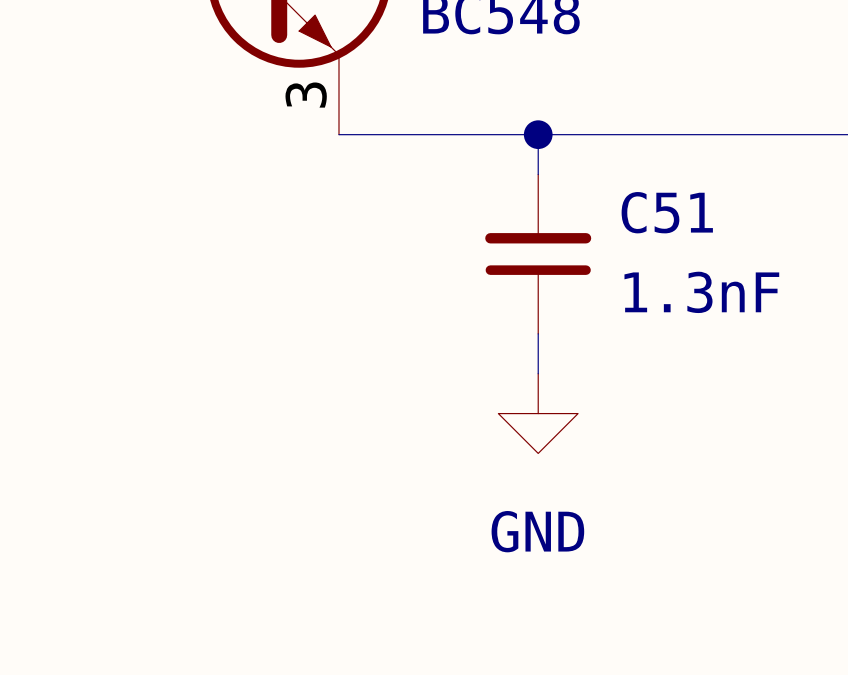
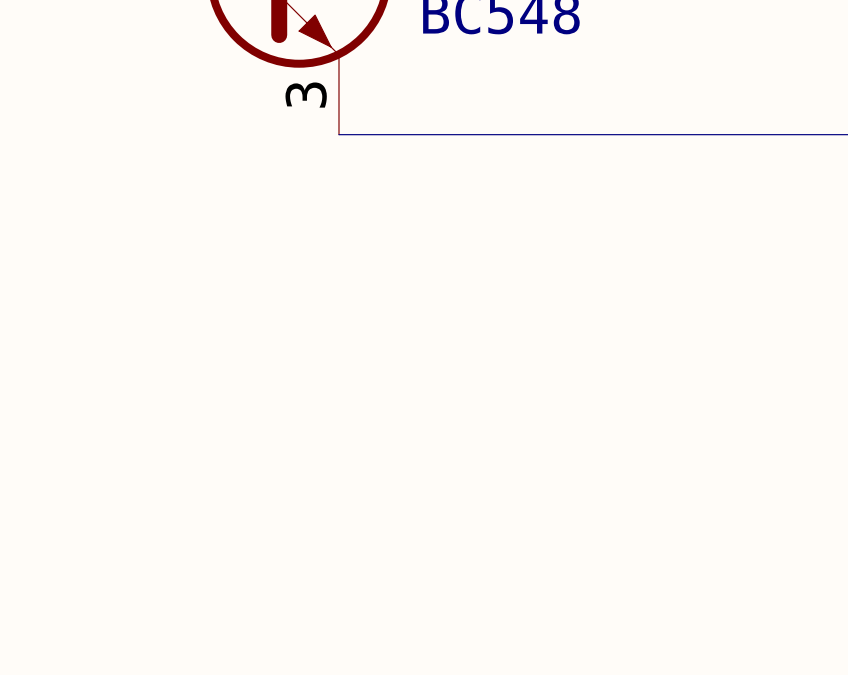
wire: (538, 134) (538, 174) -> none
junction: (538, 134) -> none
C51: 1.3nF (538, 254) -> none
wire: (538, 333) (538, 373) -> none
power symbol: GND (538, 413) -> none

